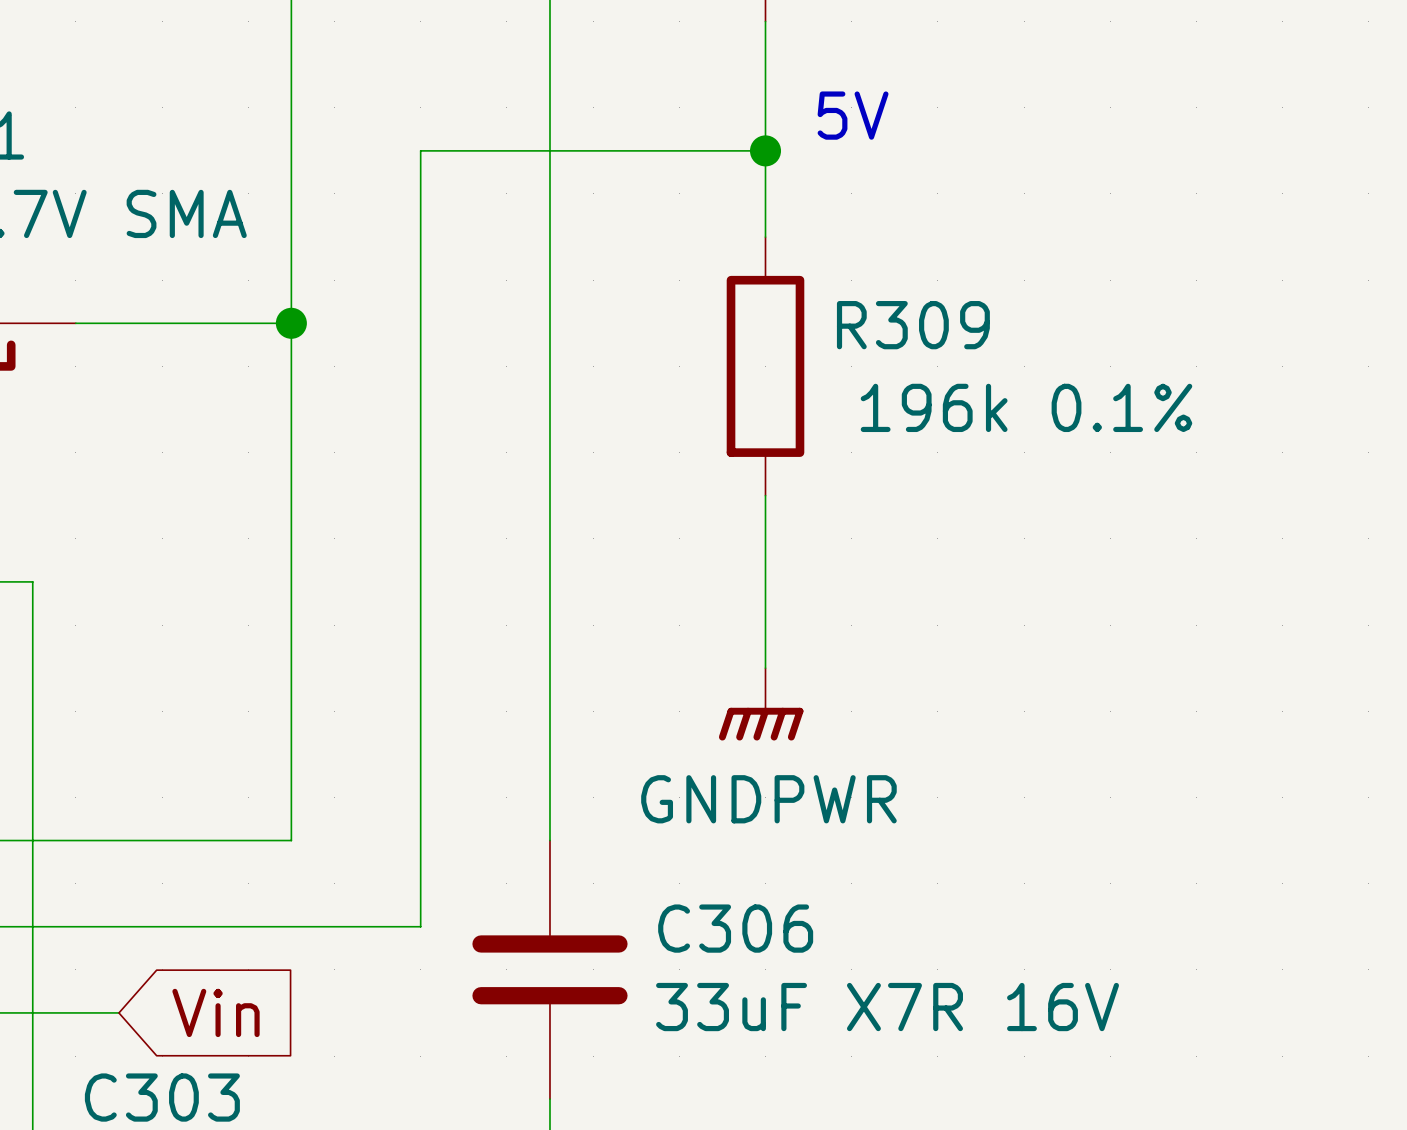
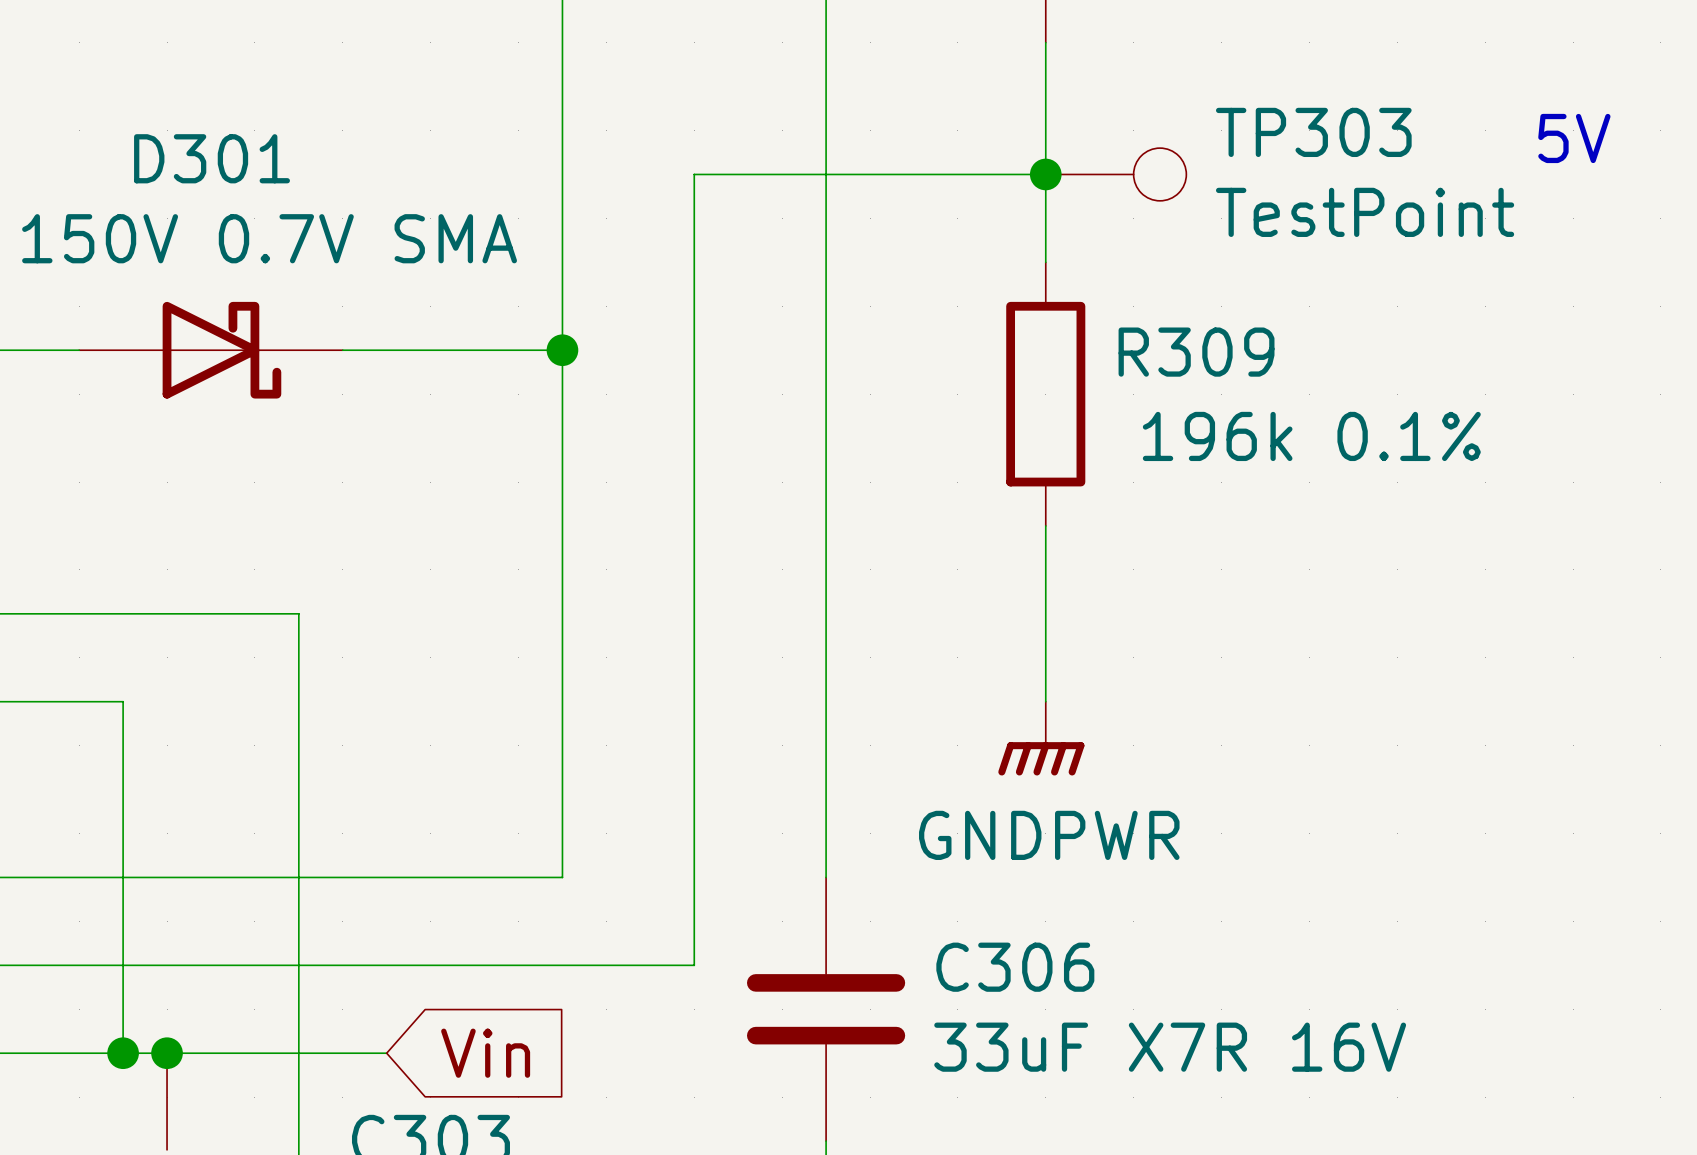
text position: 5V (853, 115) -> 5V (1574, 138)
TP303: none -> TestPoint (1116, 174)

